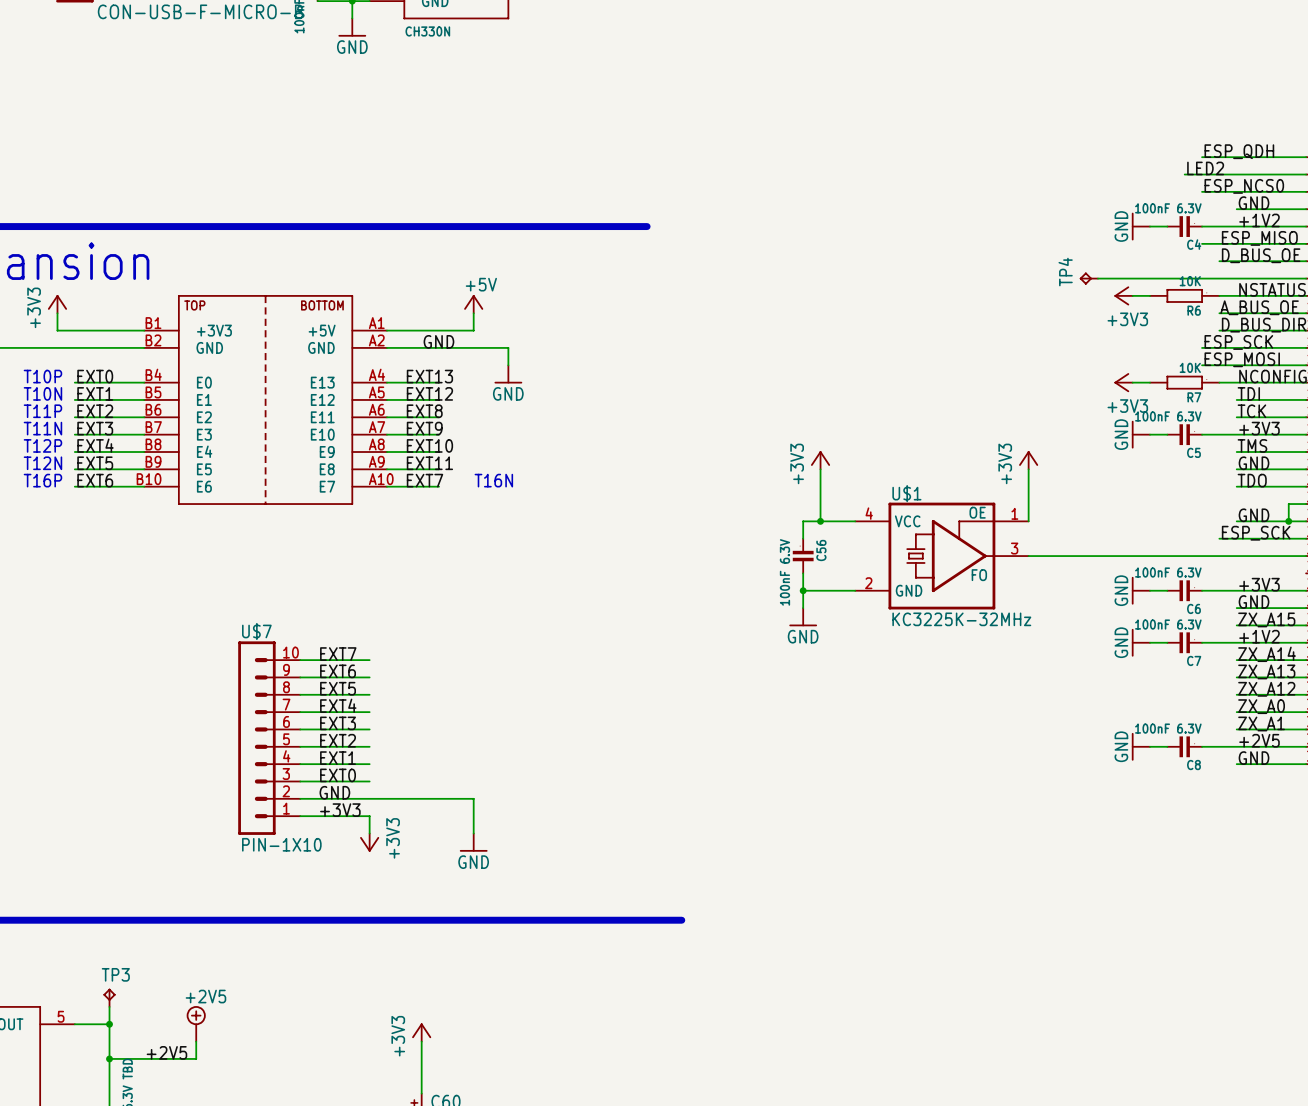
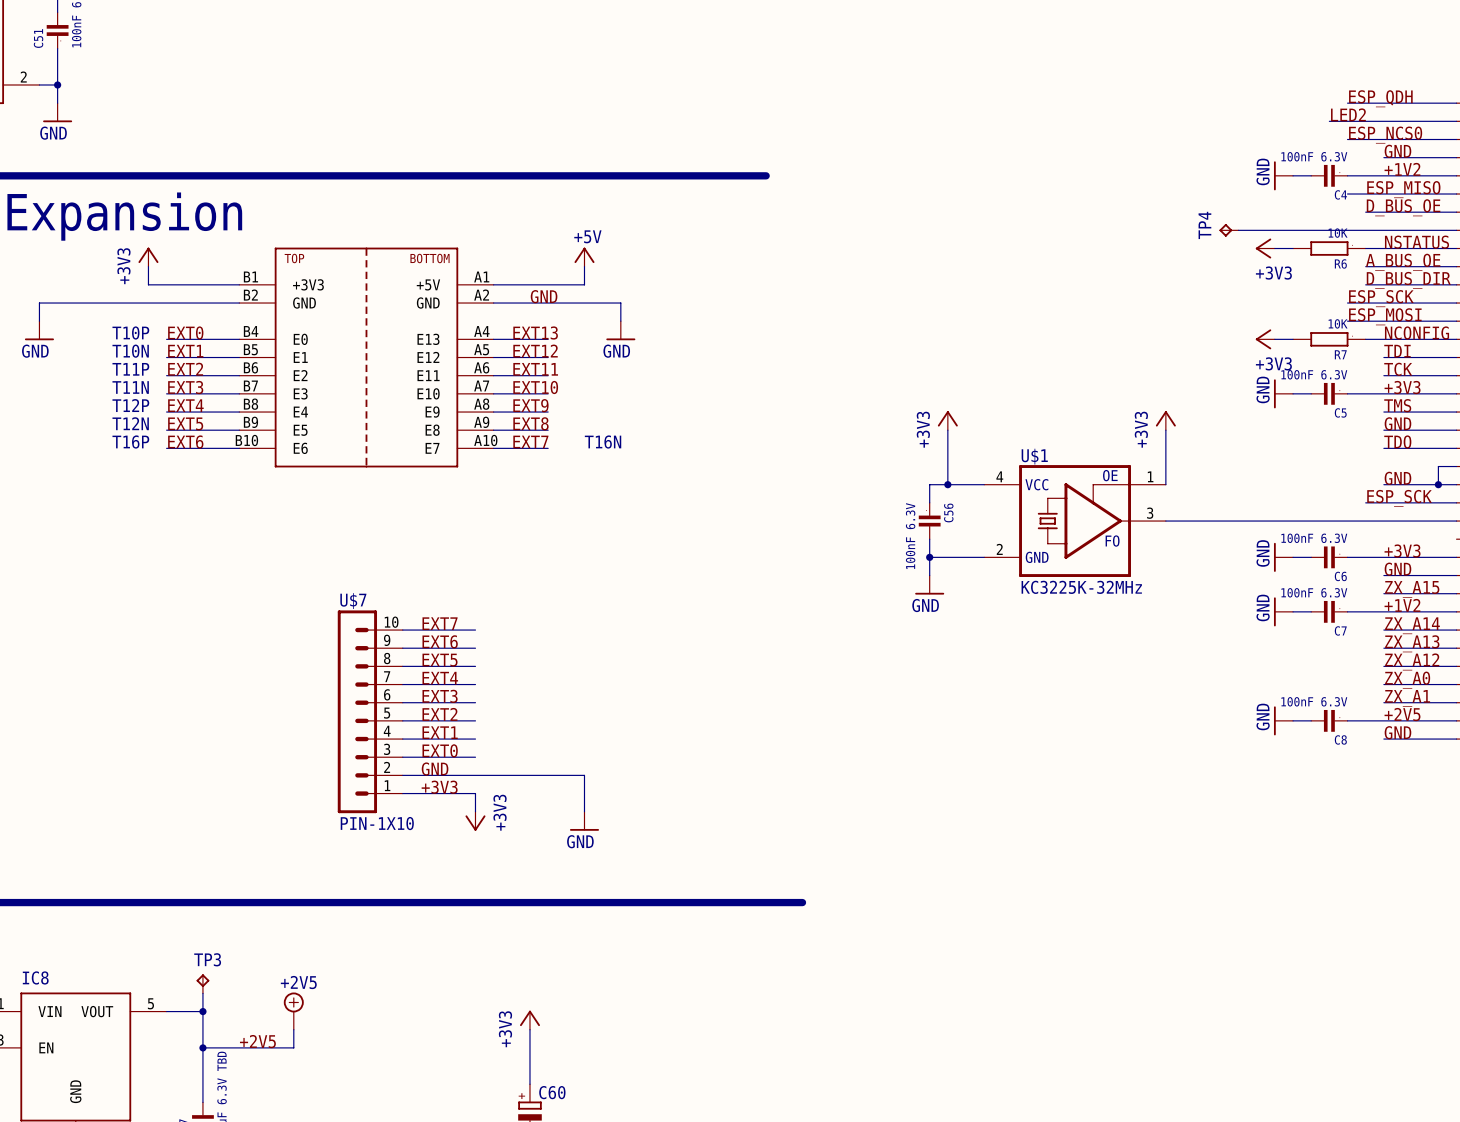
label: EXT8 (424, 411) -> EXT11 (535, 369)
label: EXT9 (424, 428) -> EXT10 (535, 387)
label: EXT10 (429, 445) -> EXT9 (530, 405)
label: EXT11 (429, 463) -> EXT8 (530, 423)

